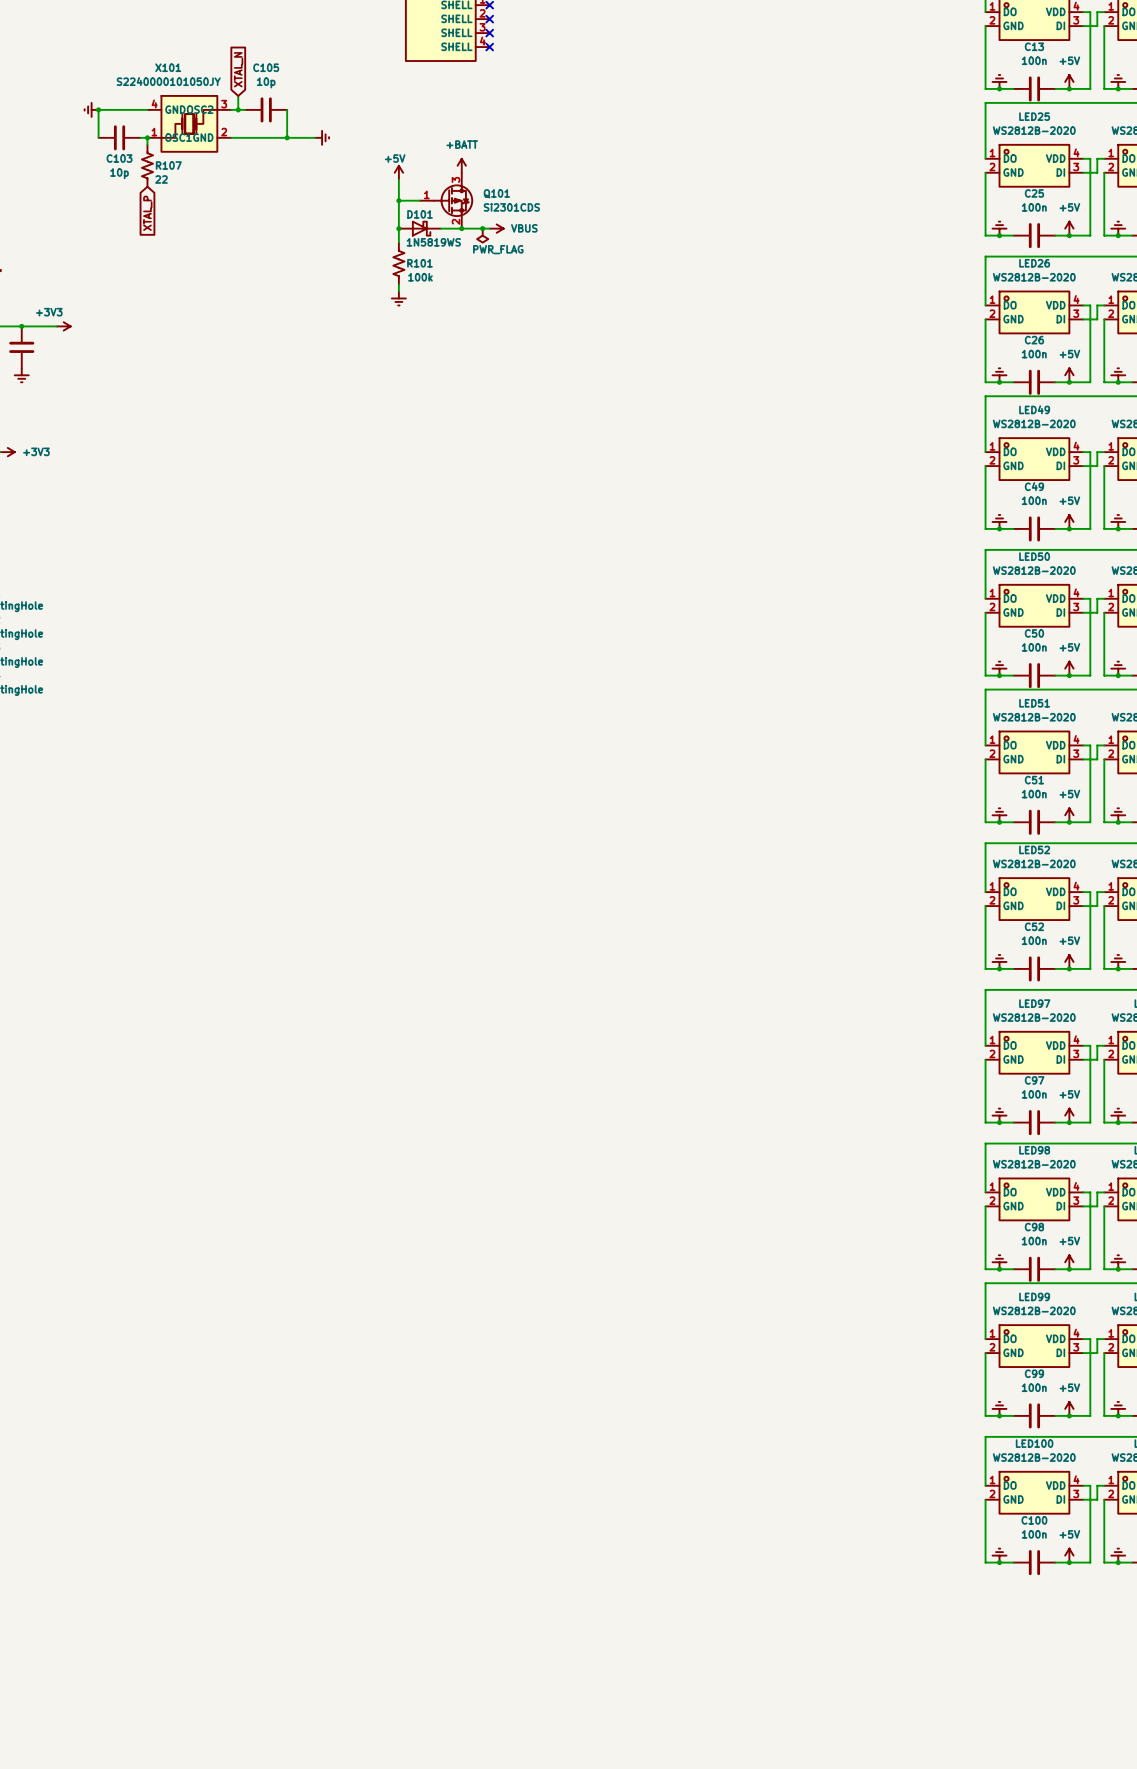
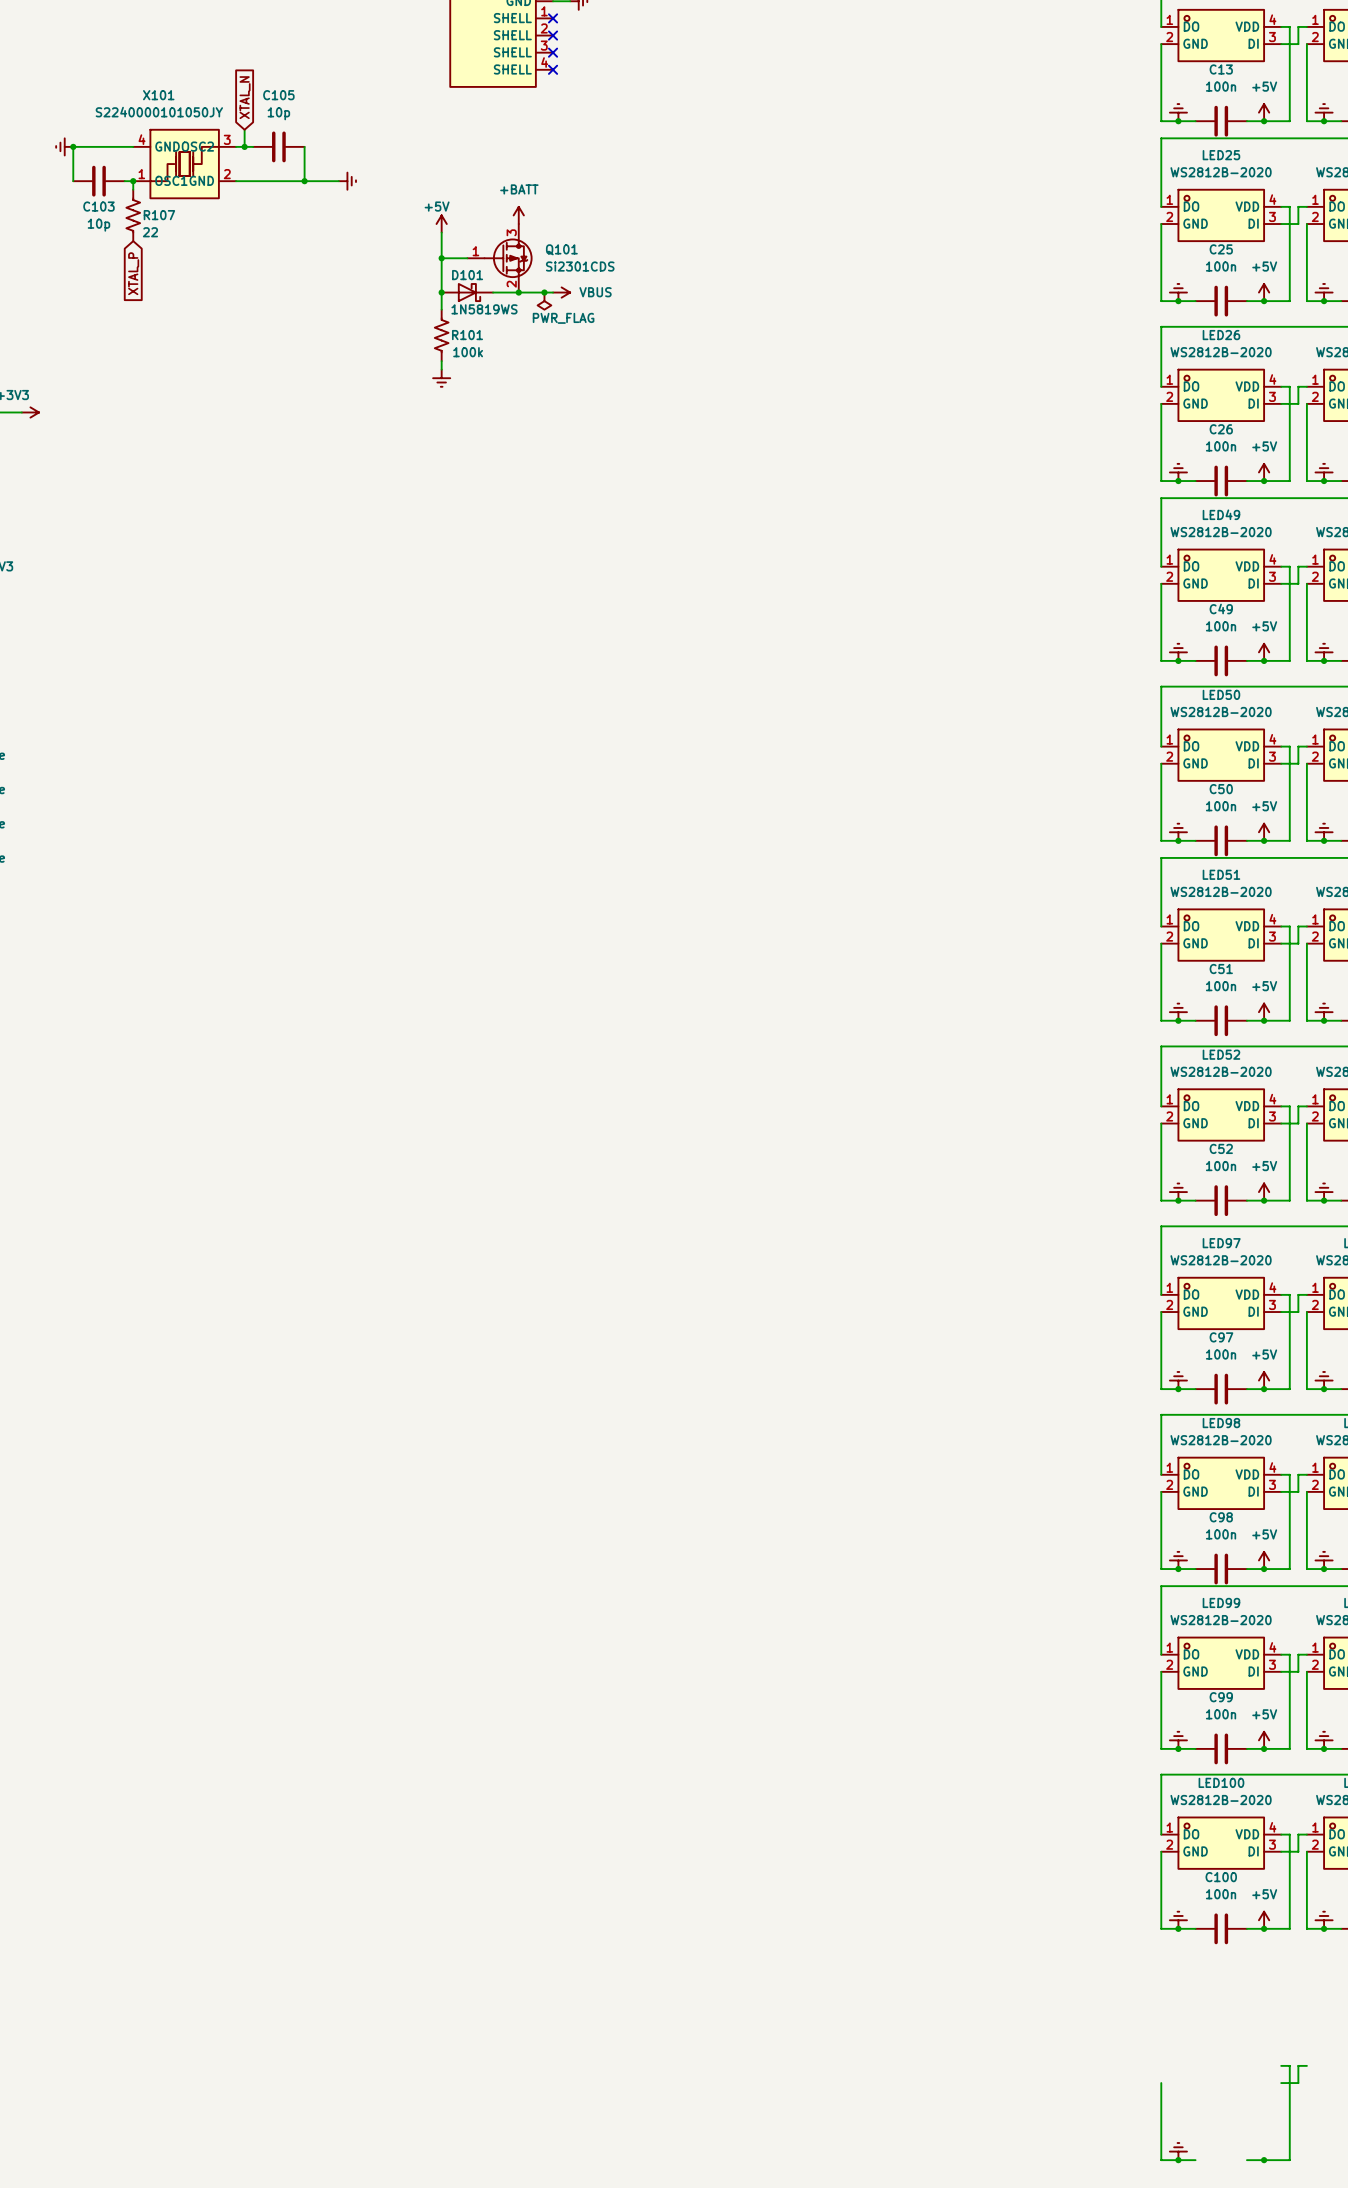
wire: none -> (1281, 2065) (1289, 2065) (1289, 2160) (1246, 2160)
wire: none -> (1306, 2065) (1298, 2065) (1298, 2083) (1281, 2083)
wire: none -> (1161, 2083) (1161, 2160) (1195, 2160)
power symbol: none -> (1178, 2151)
junction: none -> (1178, 2160)
junction: none -> (1264, 2160)

